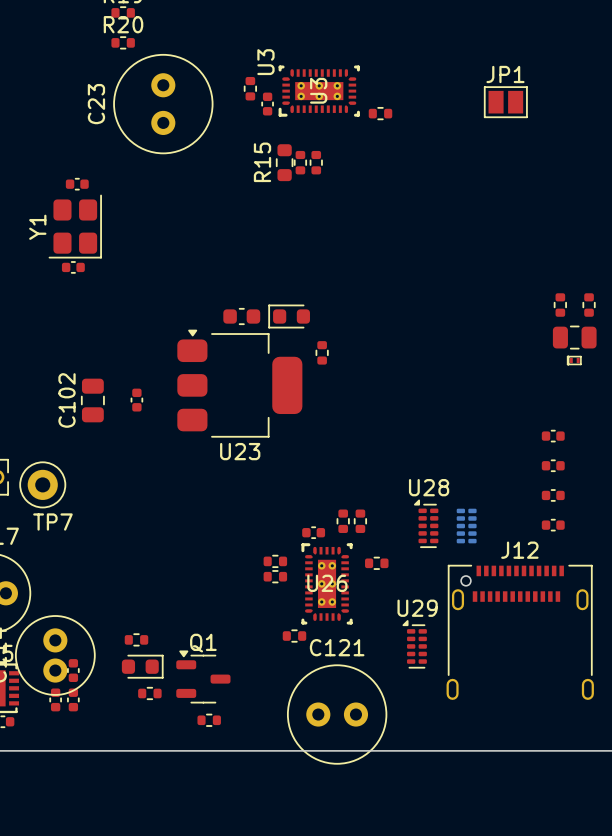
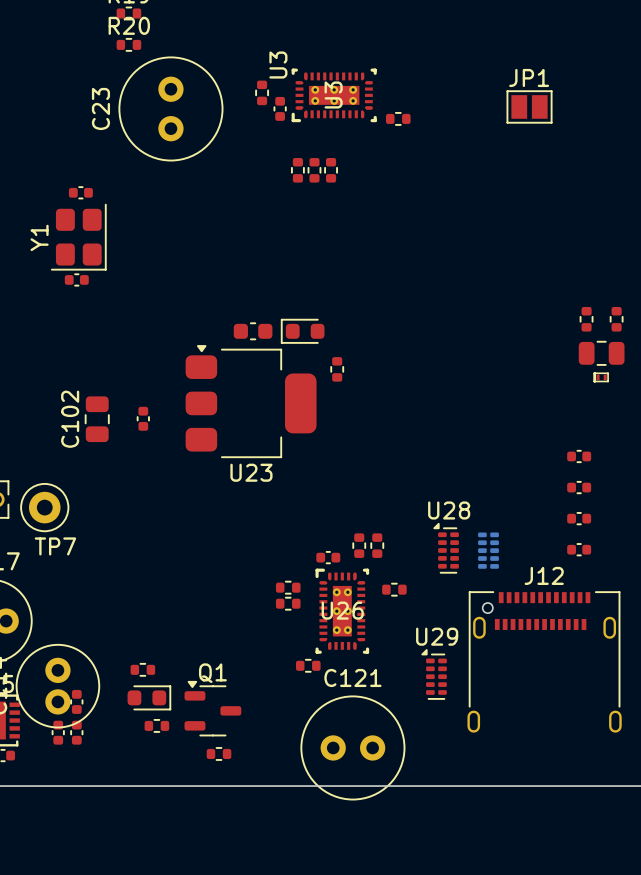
R15: (284, 162) -> none
part: none -> (297, 170)

